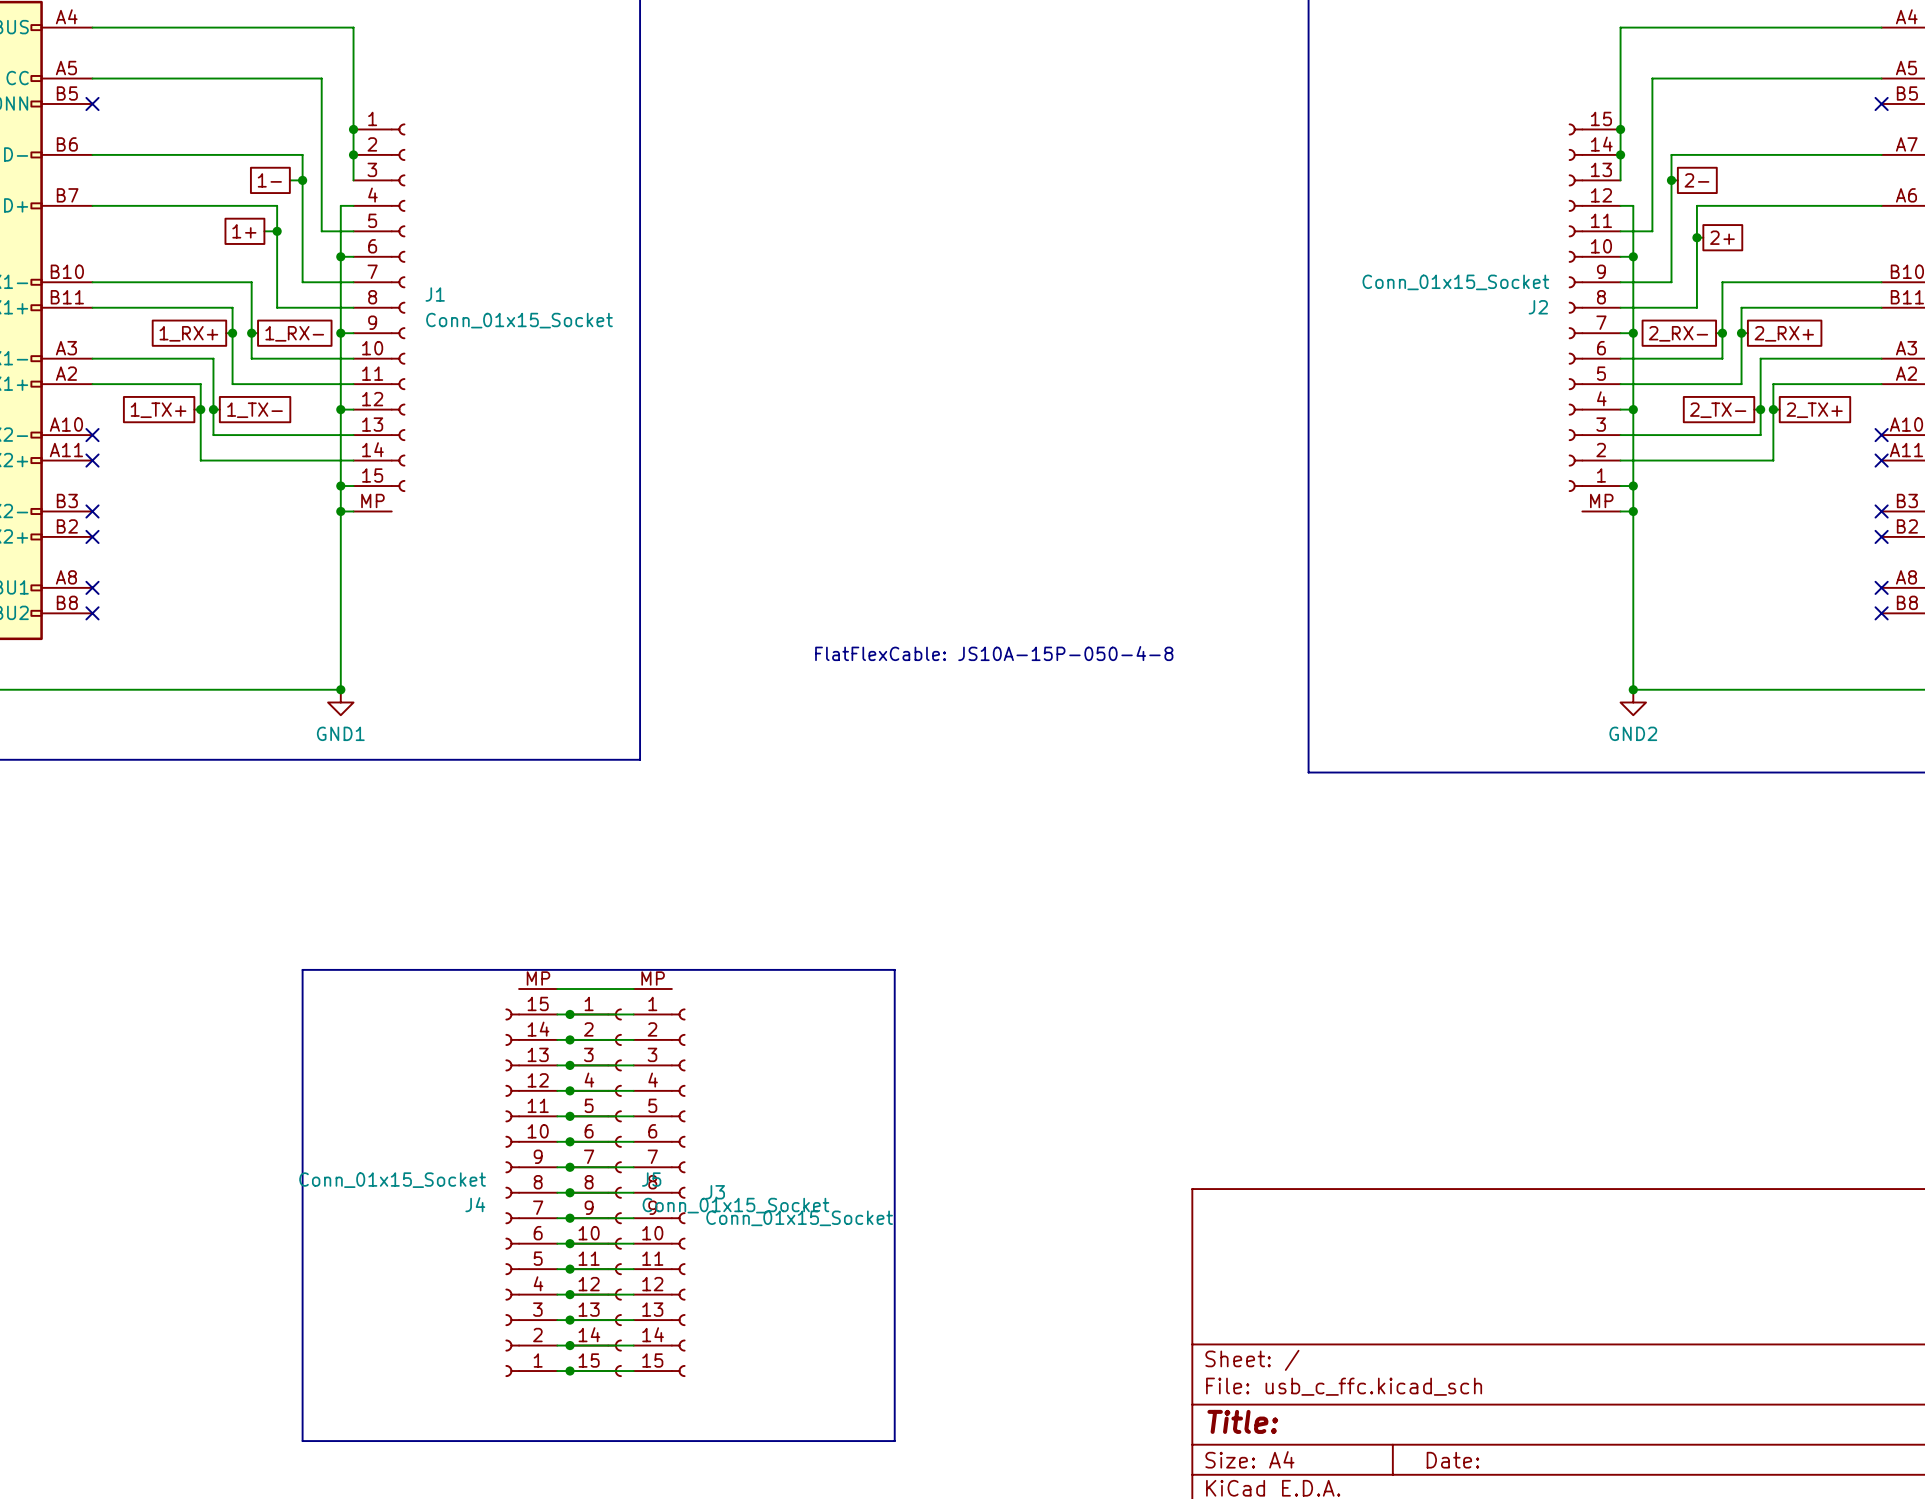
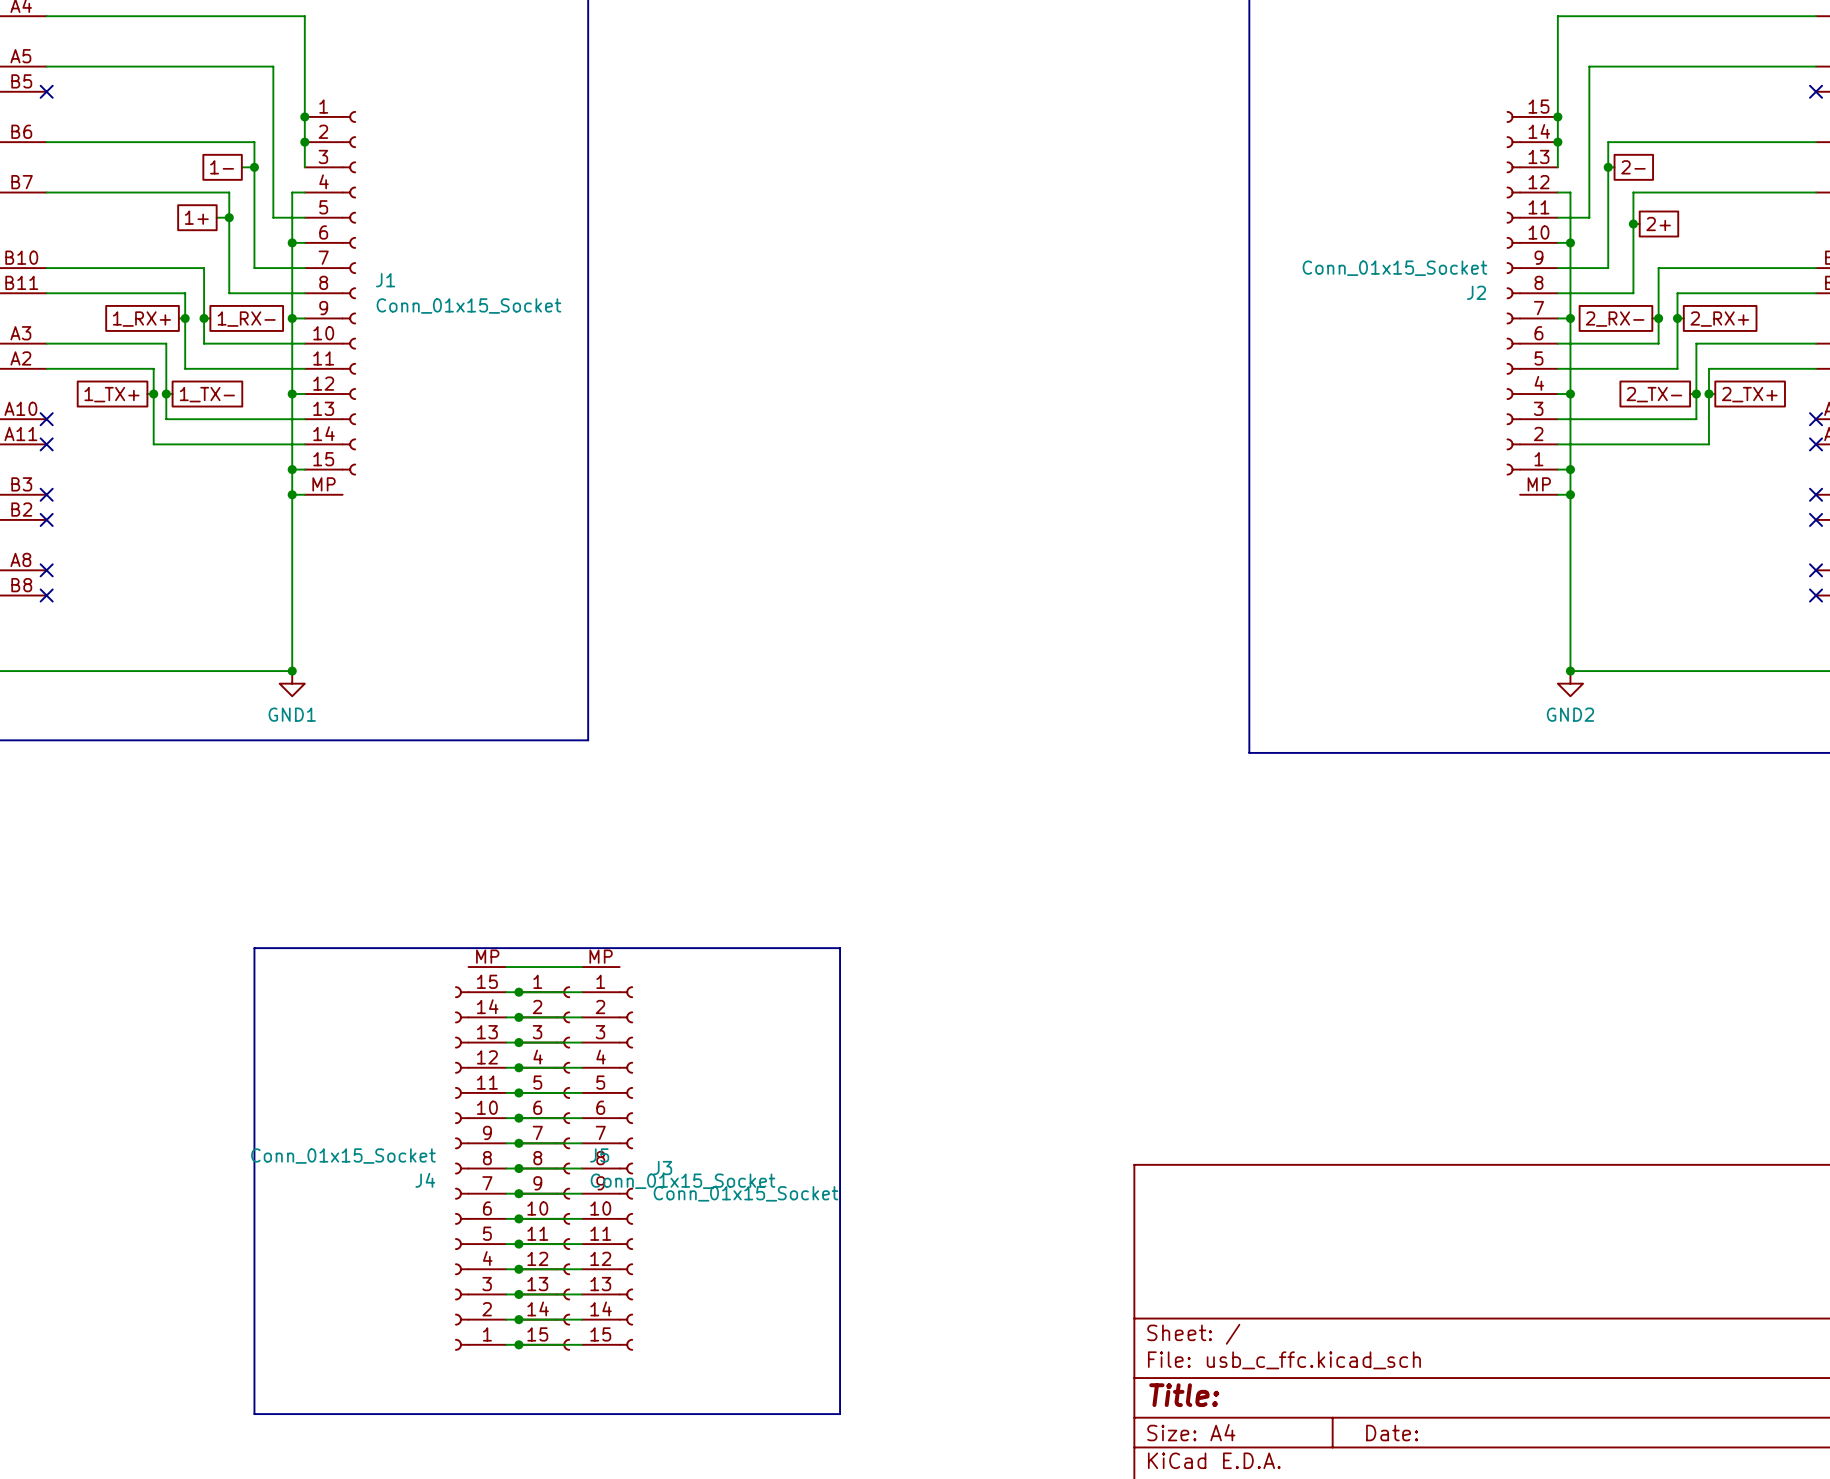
text: FlatFlexCable: JS10A-15P-050-4-8 (994, 653) -> none

